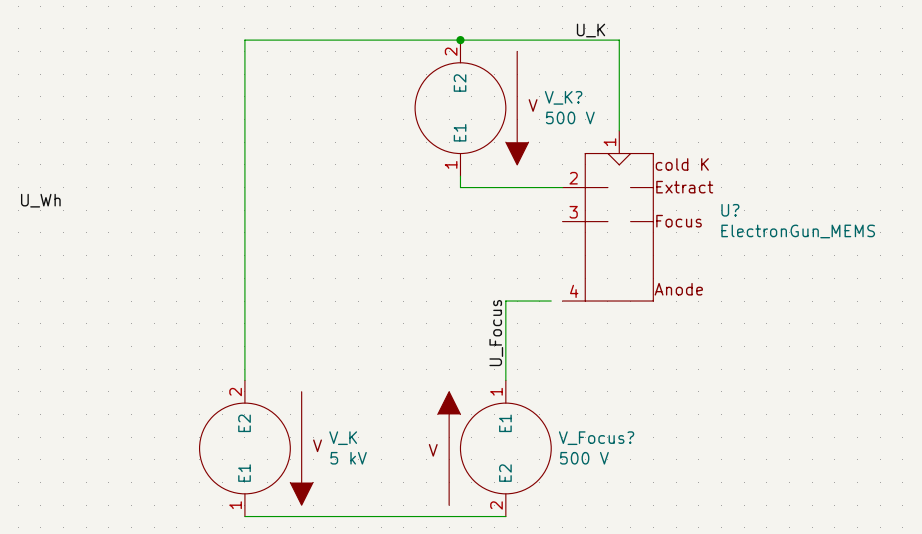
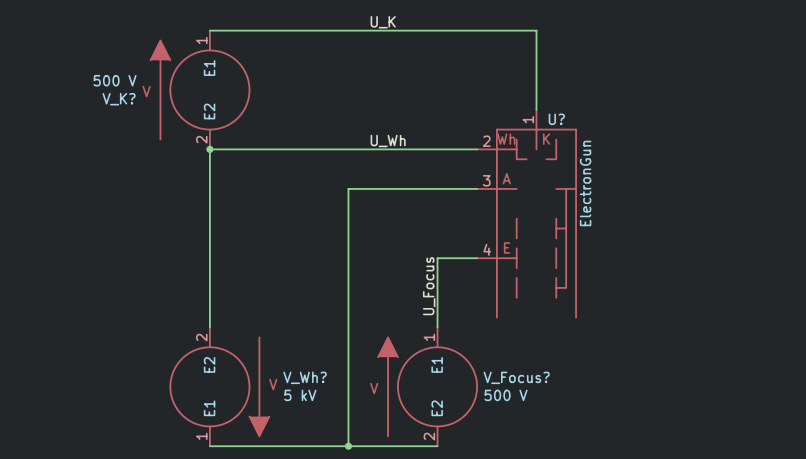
label position: U_K (591, 30) -> U_K (383, 22)
wire: (244, 40) (244, 176) -> (477, 149) (209, 149)
junction: (460, 40) -> none
V_K?: none -> 500 V (200, 90)
V_K?: 500 V (471, 108) -> none
label: none -> U_Wh (388, 141)
junction: none -> (209, 149)
wire: (460, 176) (460, 187) (562, 187) -> none
label: U_Wh (40, 200) -> none
U?: ElectronGun_MEMS (607, 215) -> none
wire: none -> (477, 188) (348, 188) (348, 446)
U?: none -> ElectronGun (526, 213)
V_K name: V_K (343, 438) -> V_Wh? (305, 377)
junction: none -> (348, 446)

